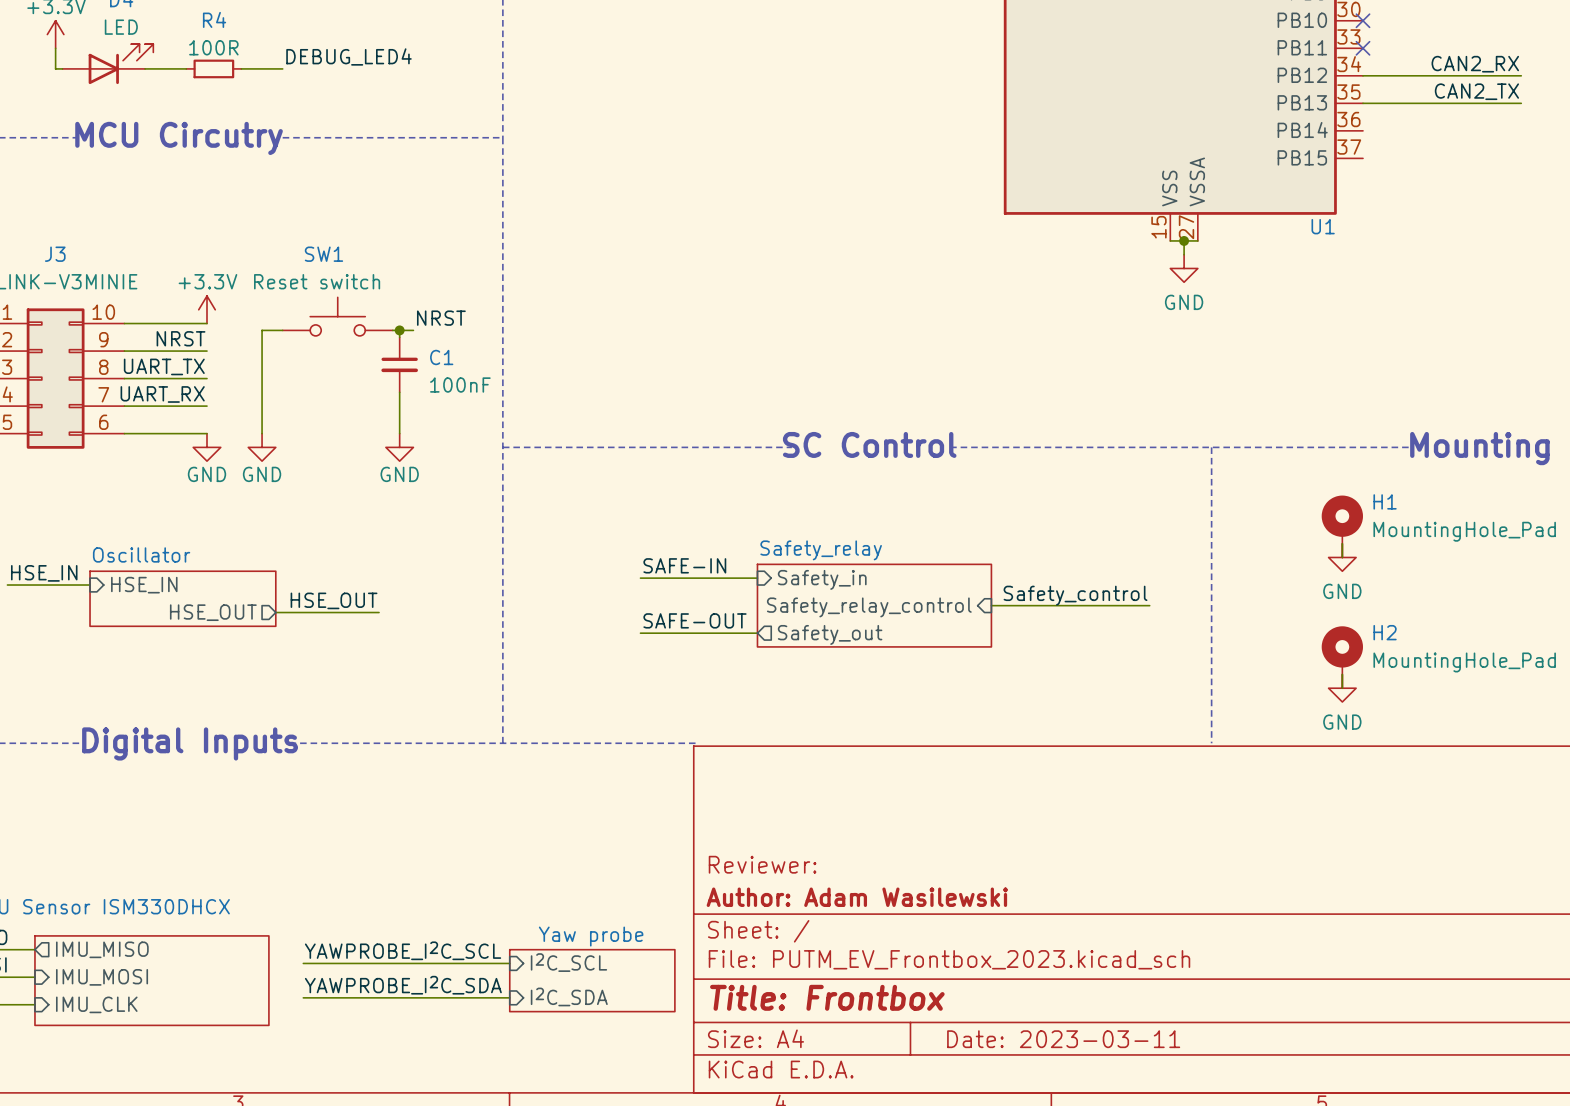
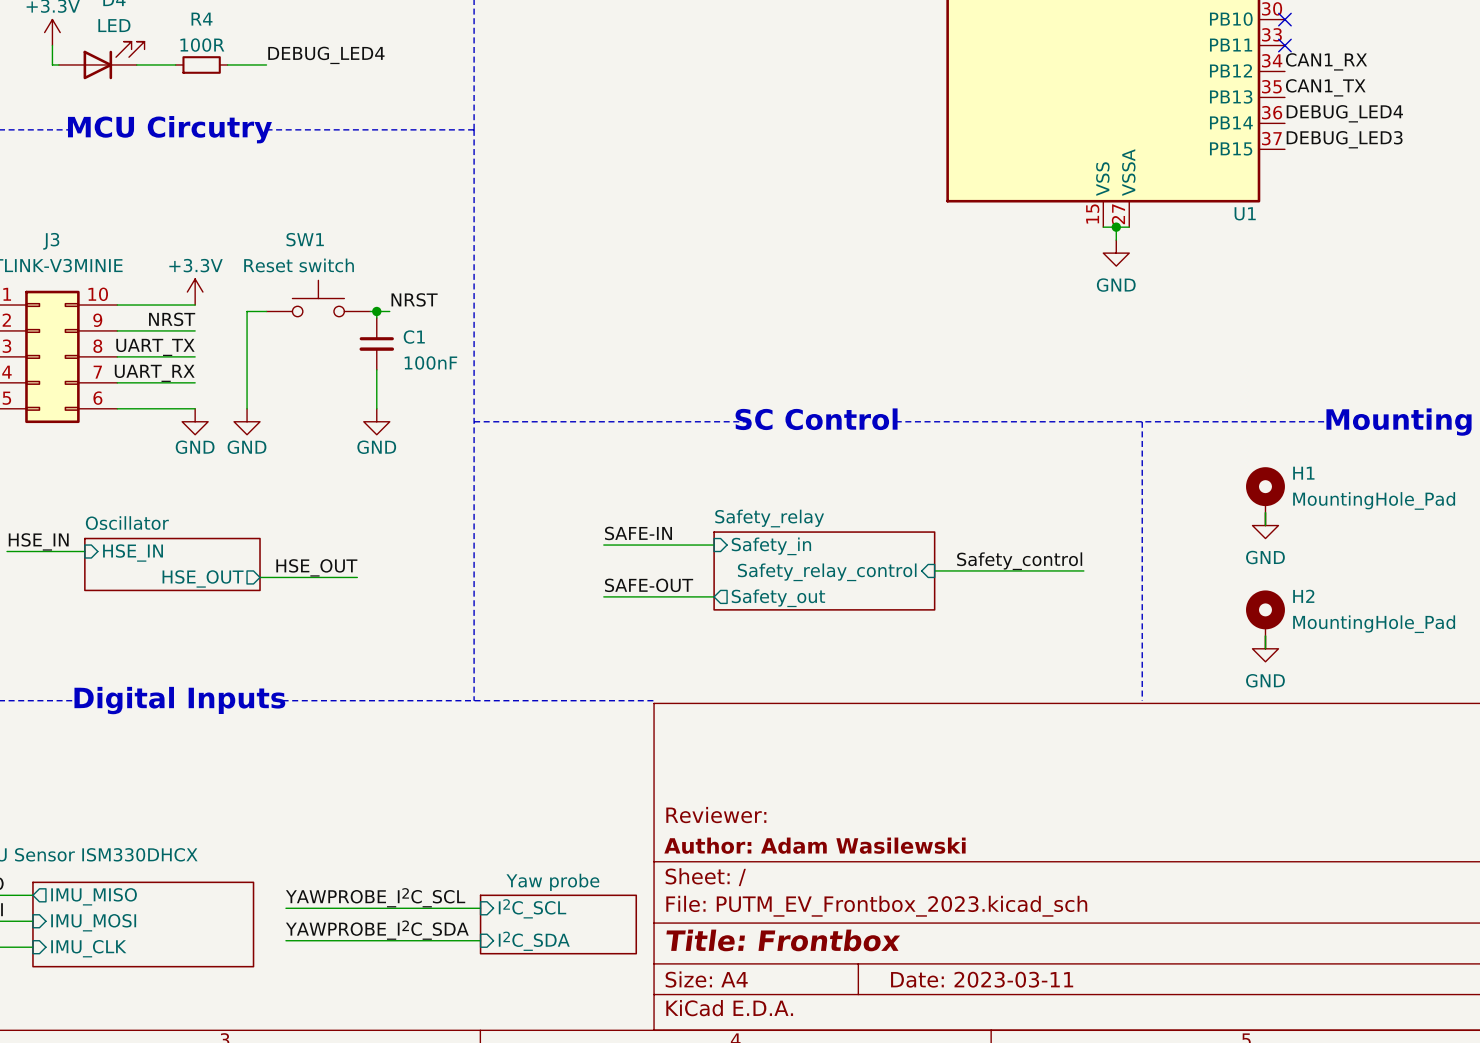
label: none -> CAN1_RX (1326, 61)
label: CAN2_RX (1475, 64) -> none
wire: (1362, 75) (1521, 75) -> none
label: none -> CAN1_TX (1325, 87)
label: CAN2_TX (1476, 91) -> none
wire: (1362, 103) (1521, 103) -> none
label: none -> DEBUG_LED4 (1344, 113)
label: none -> DEBUG_LED3 (1344, 139)

